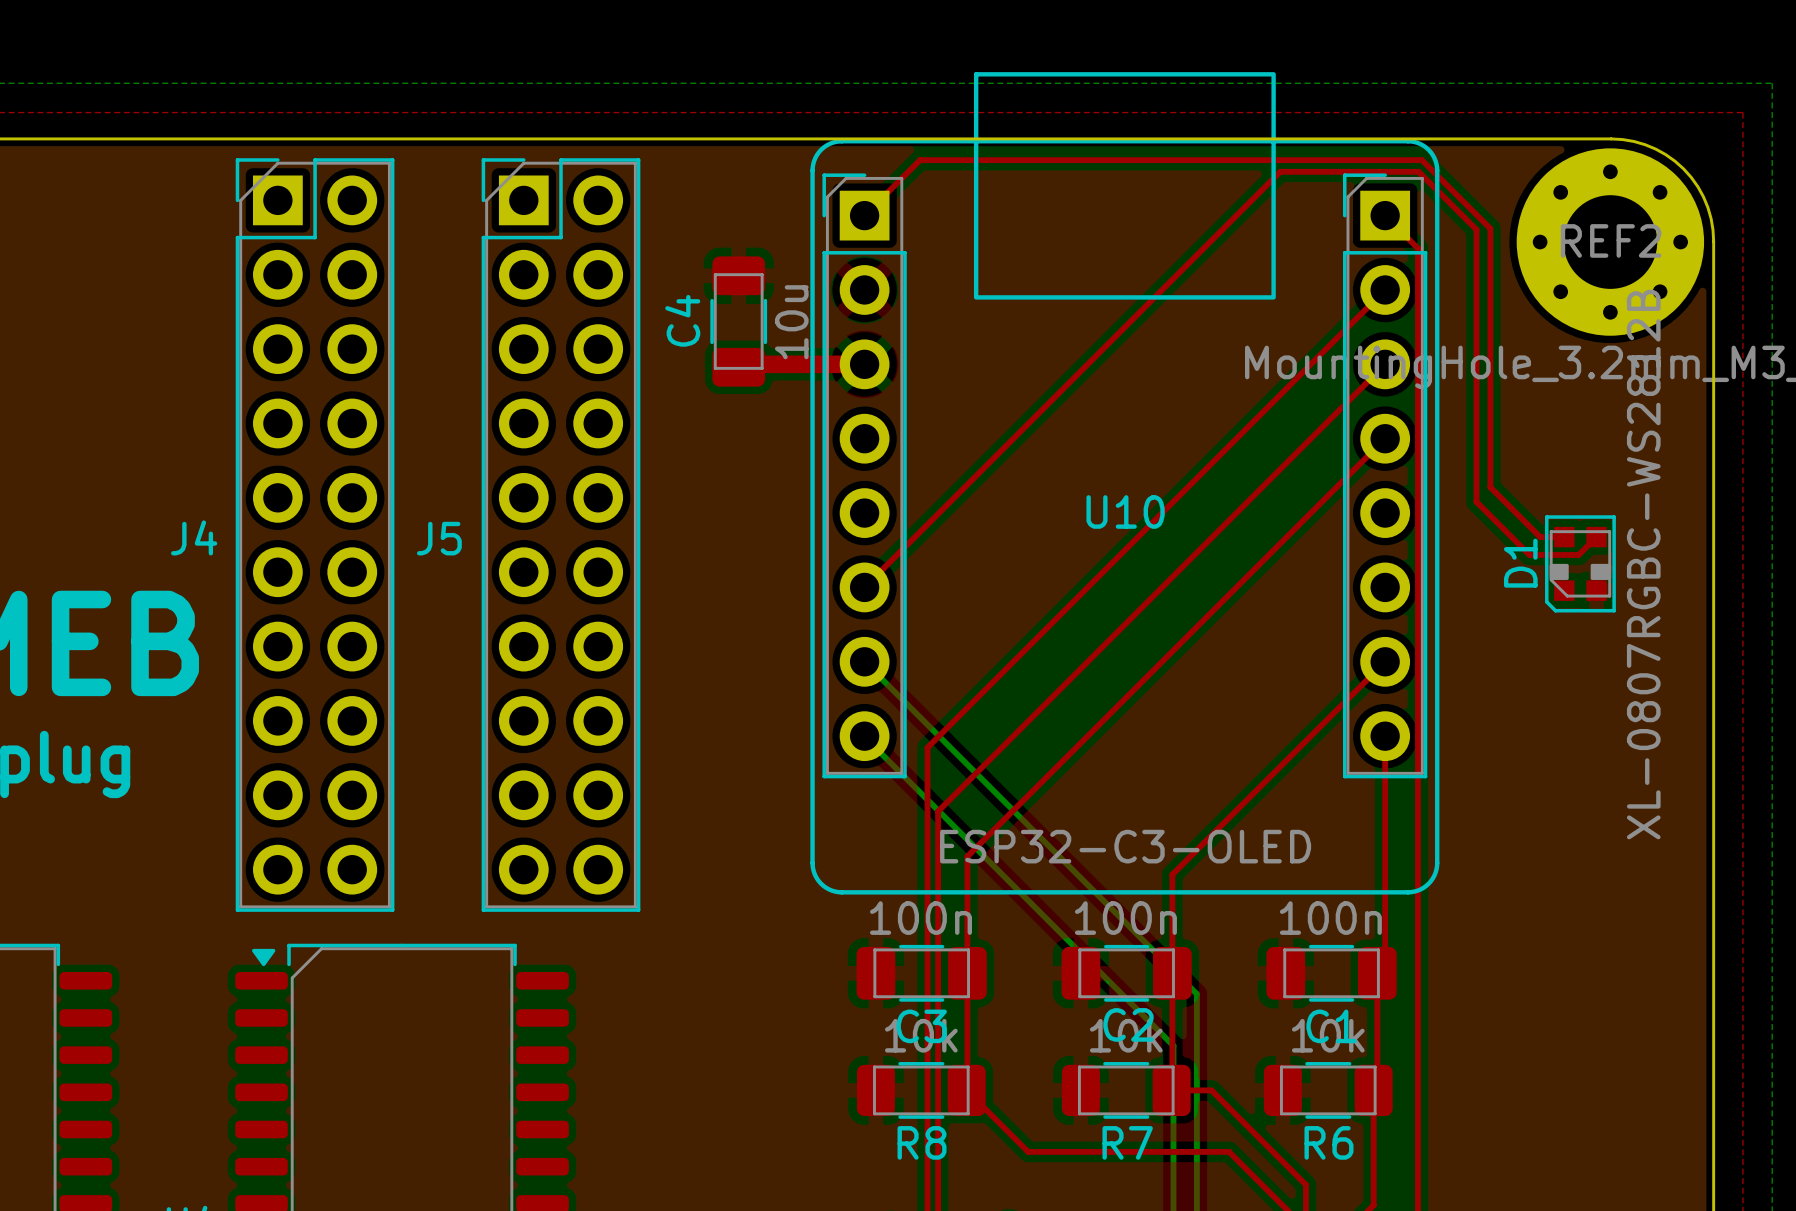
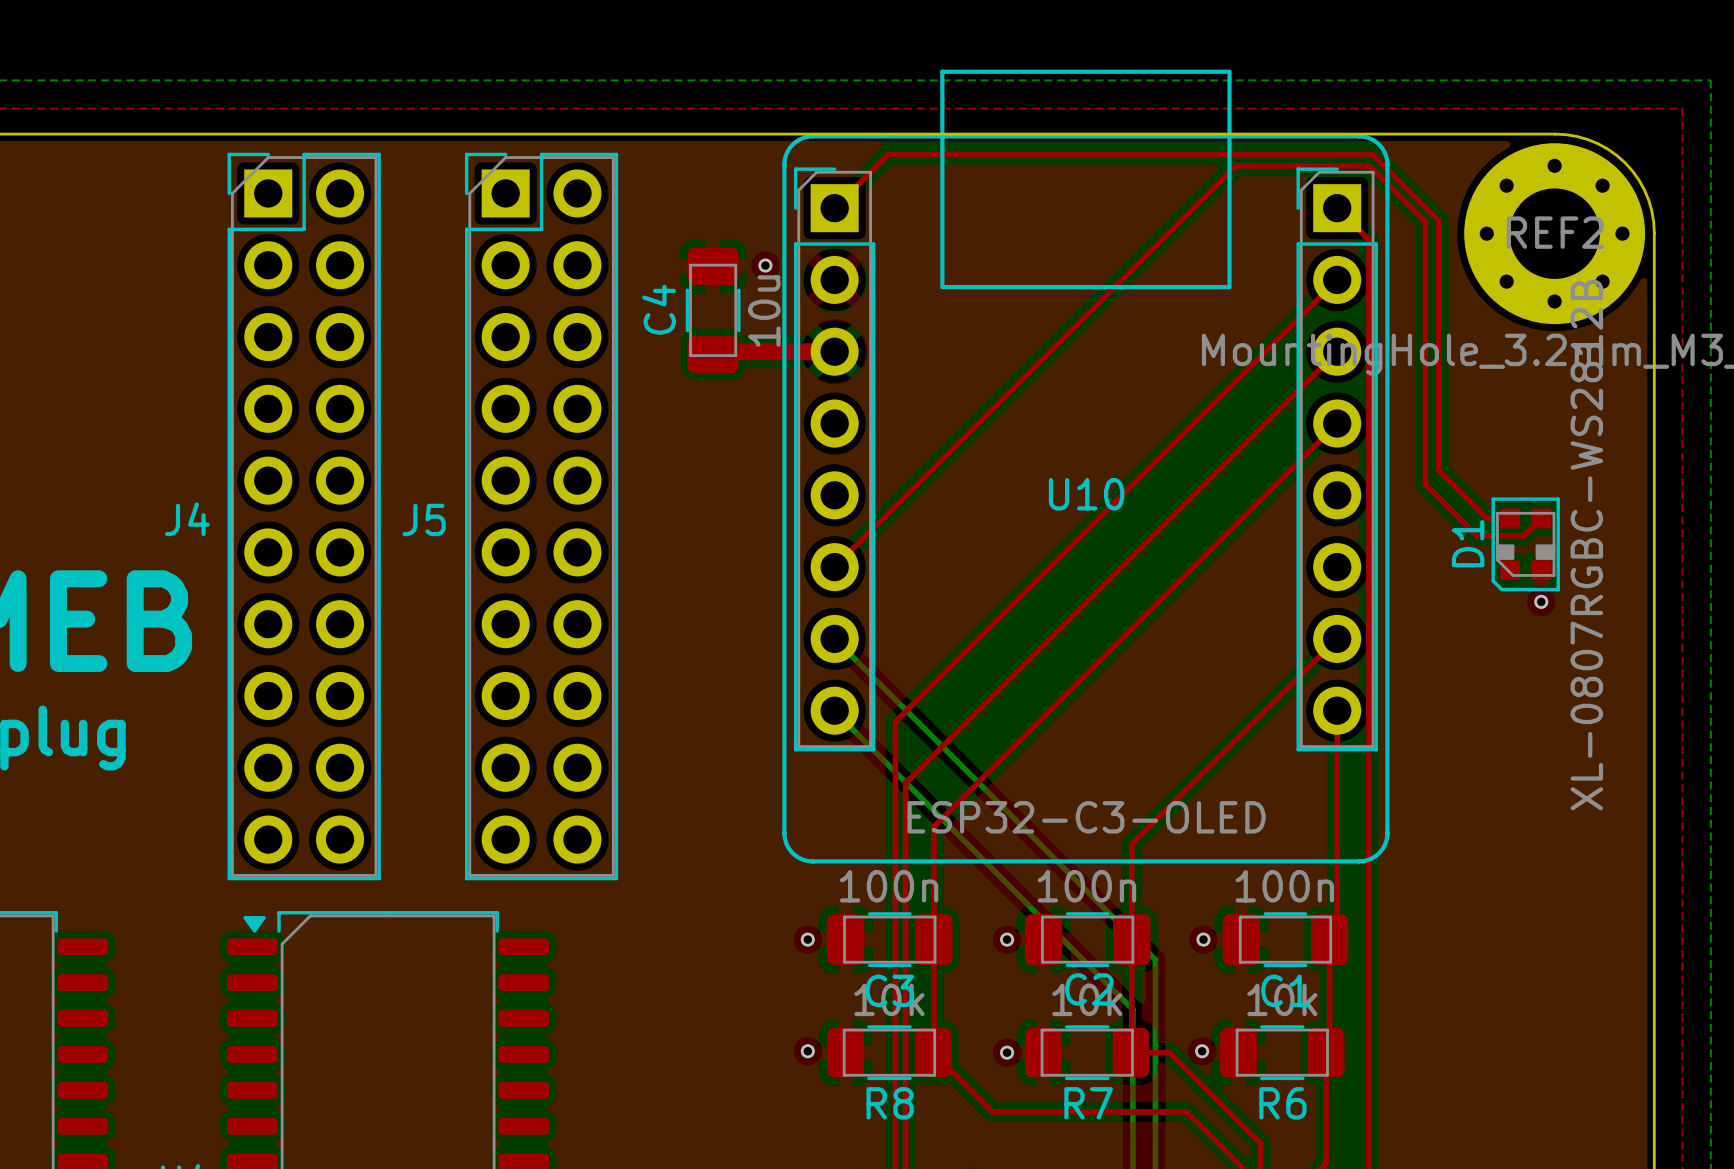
via: none -> (765, 265)
via: none -> (1541, 601)
via: none -> (807, 939)
via: none -> (1007, 939)
via: none -> (1203, 939)
via: none -> (807, 1051)
via: none -> (1202, 1051)
via: none -> (1007, 1052)

